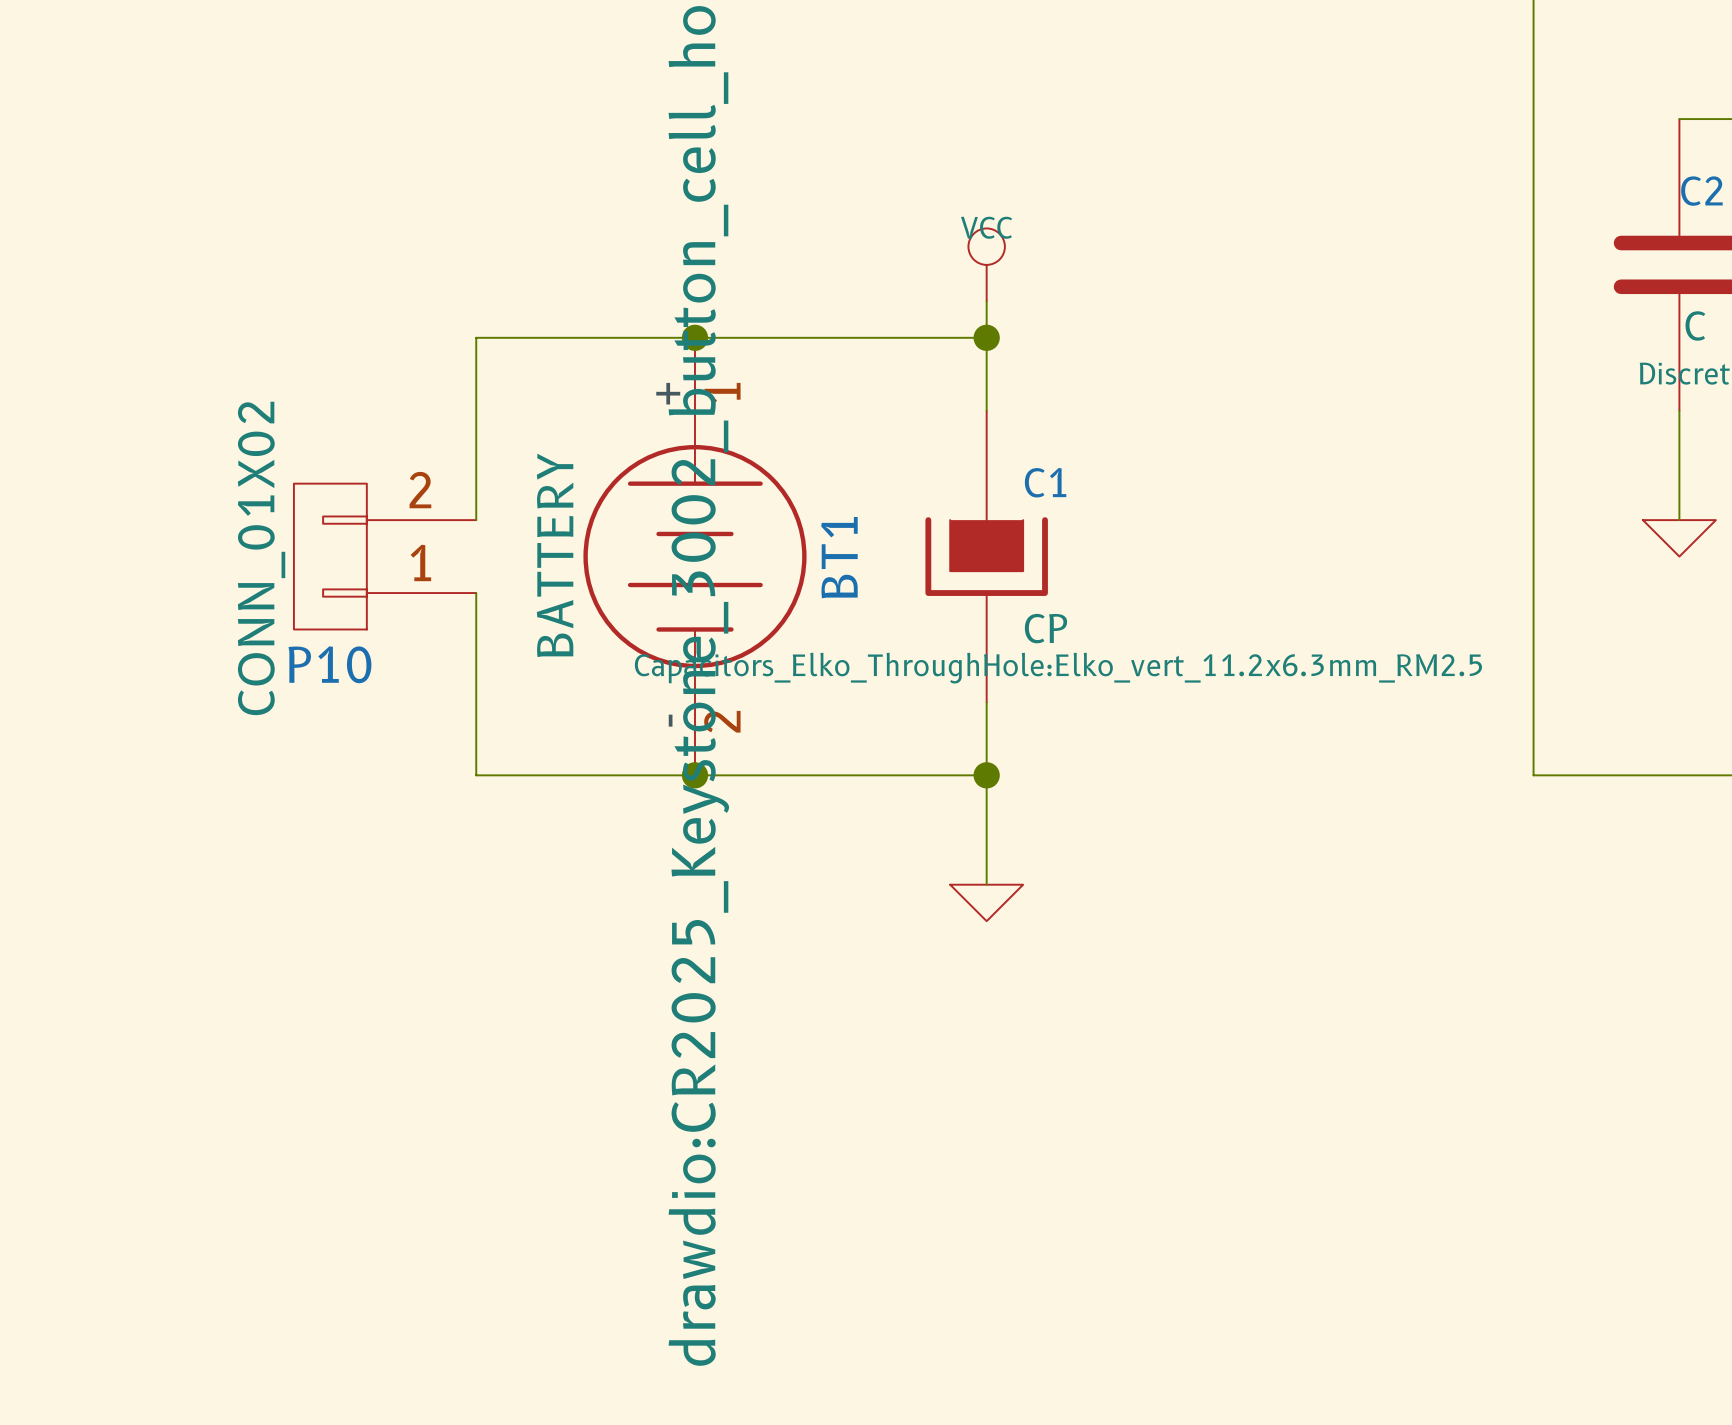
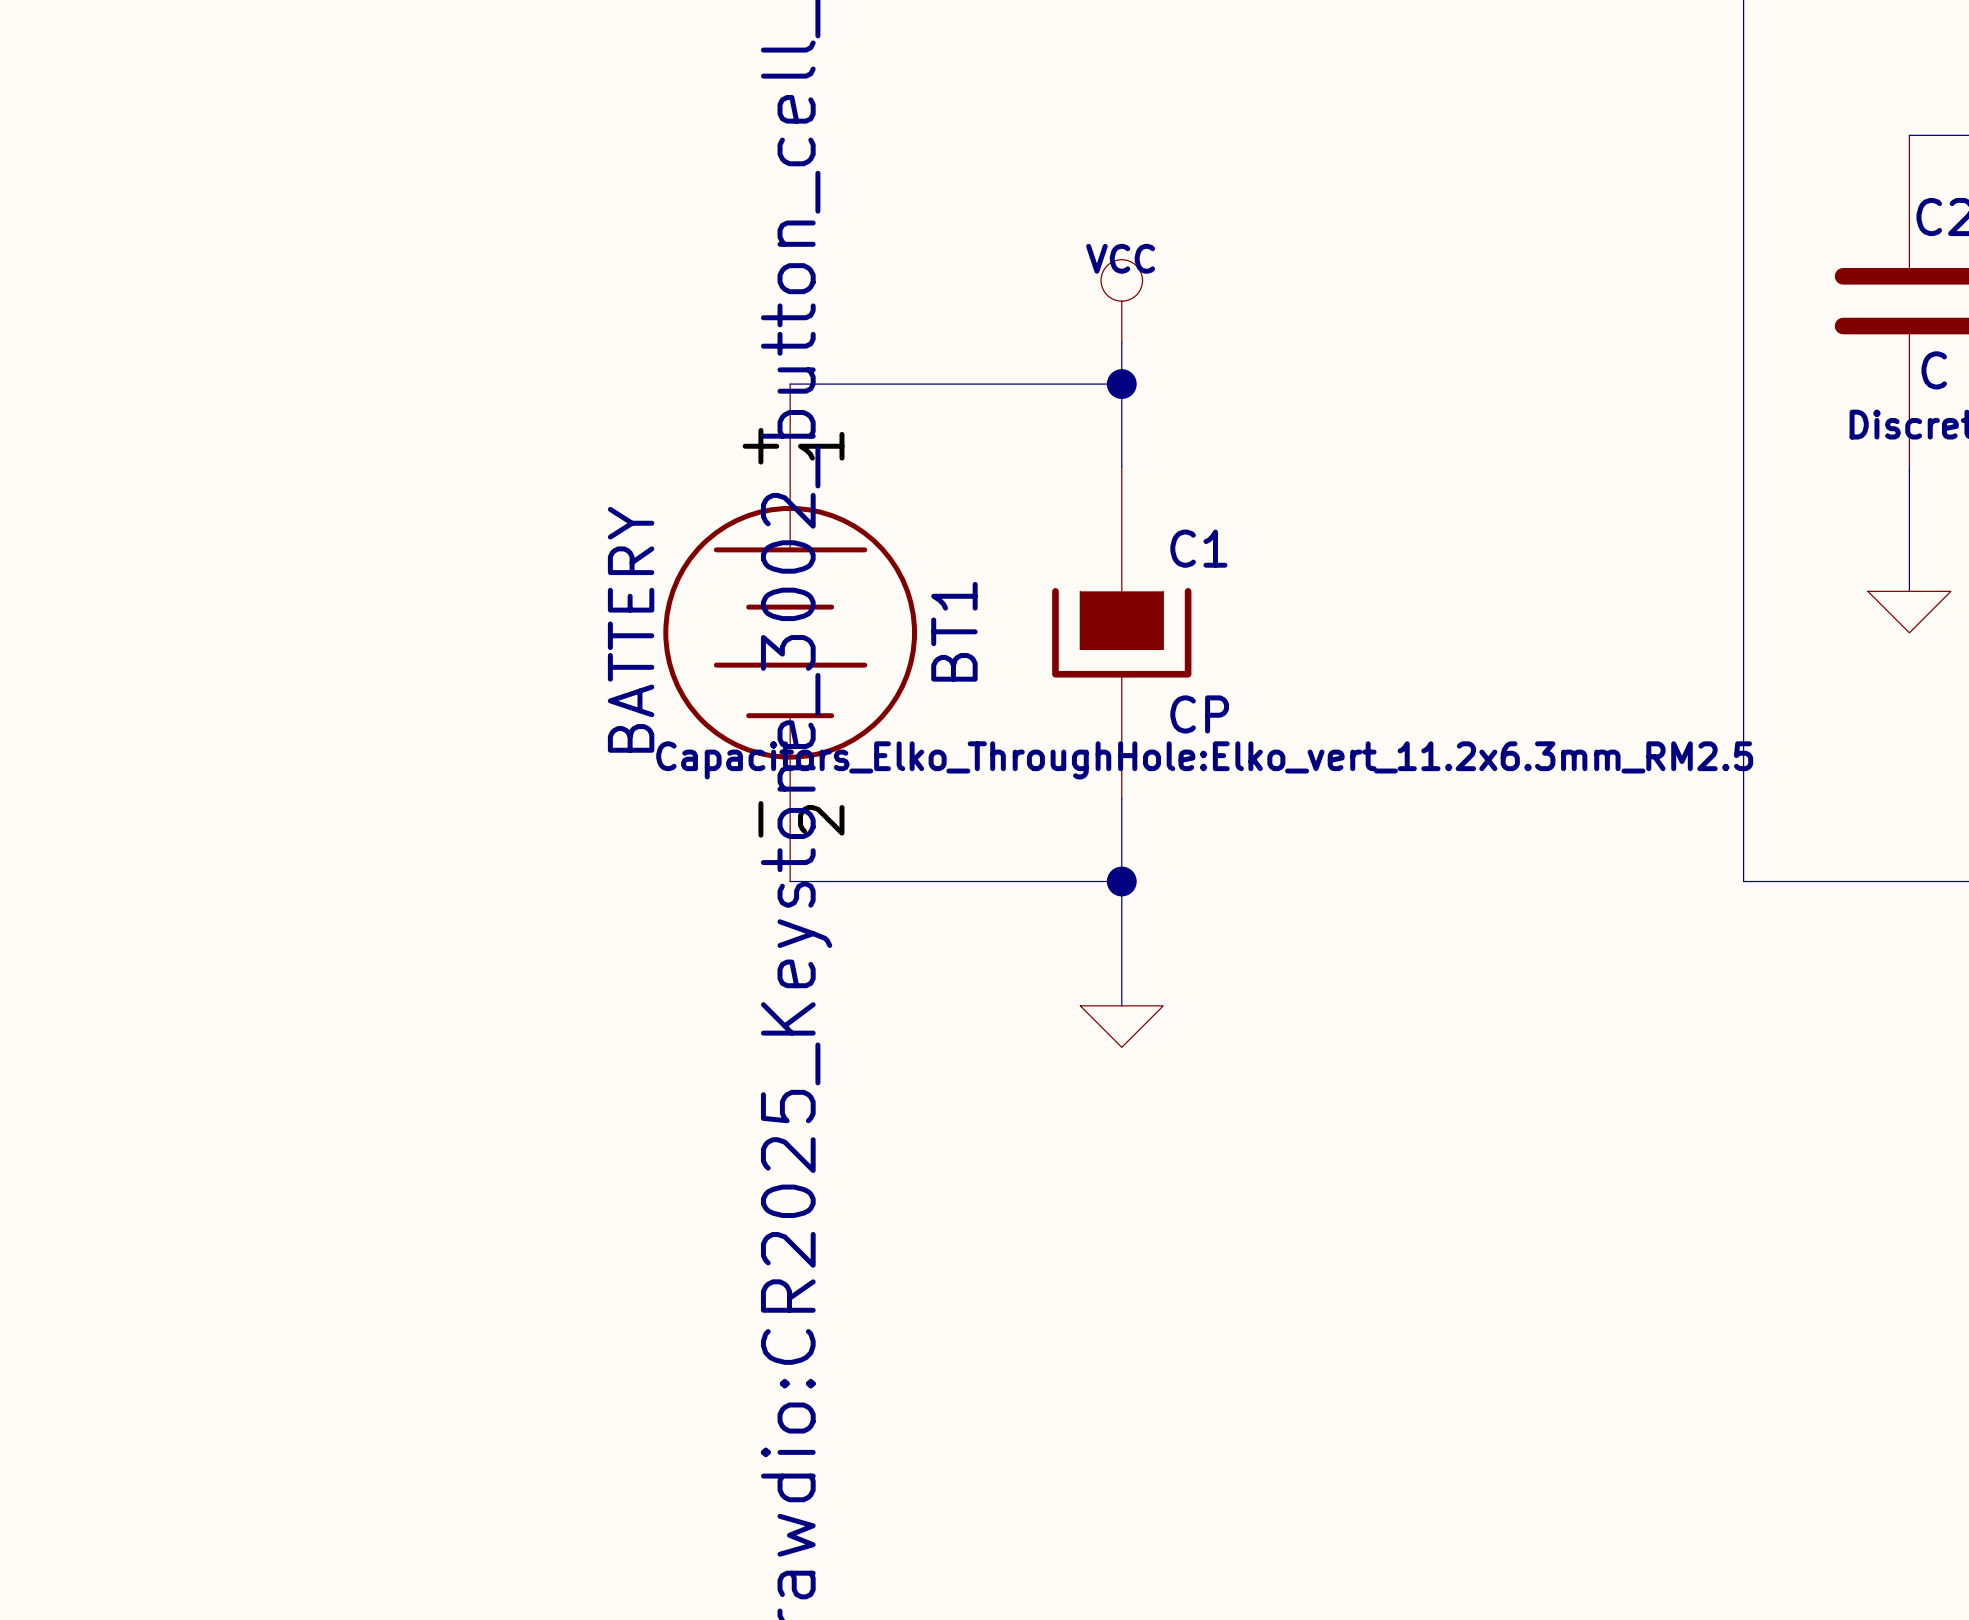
wire: (694, 337) (476, 337) (476, 520) -> none
junction: (694, 337) -> none
P10: CONN_01X02 (385, 556) -> none
wire: (476, 593) (476, 775) (694, 775) -> none
junction: (694, 775) -> none

